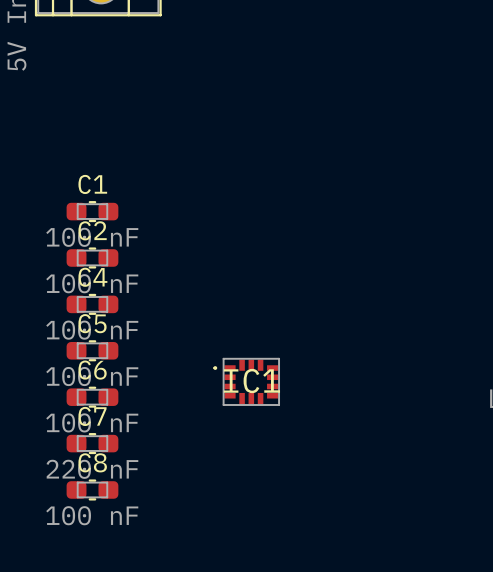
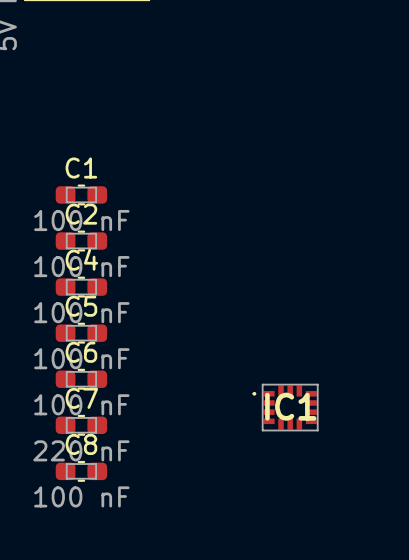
IC1 position: (246, 381) -> (285, 407)

